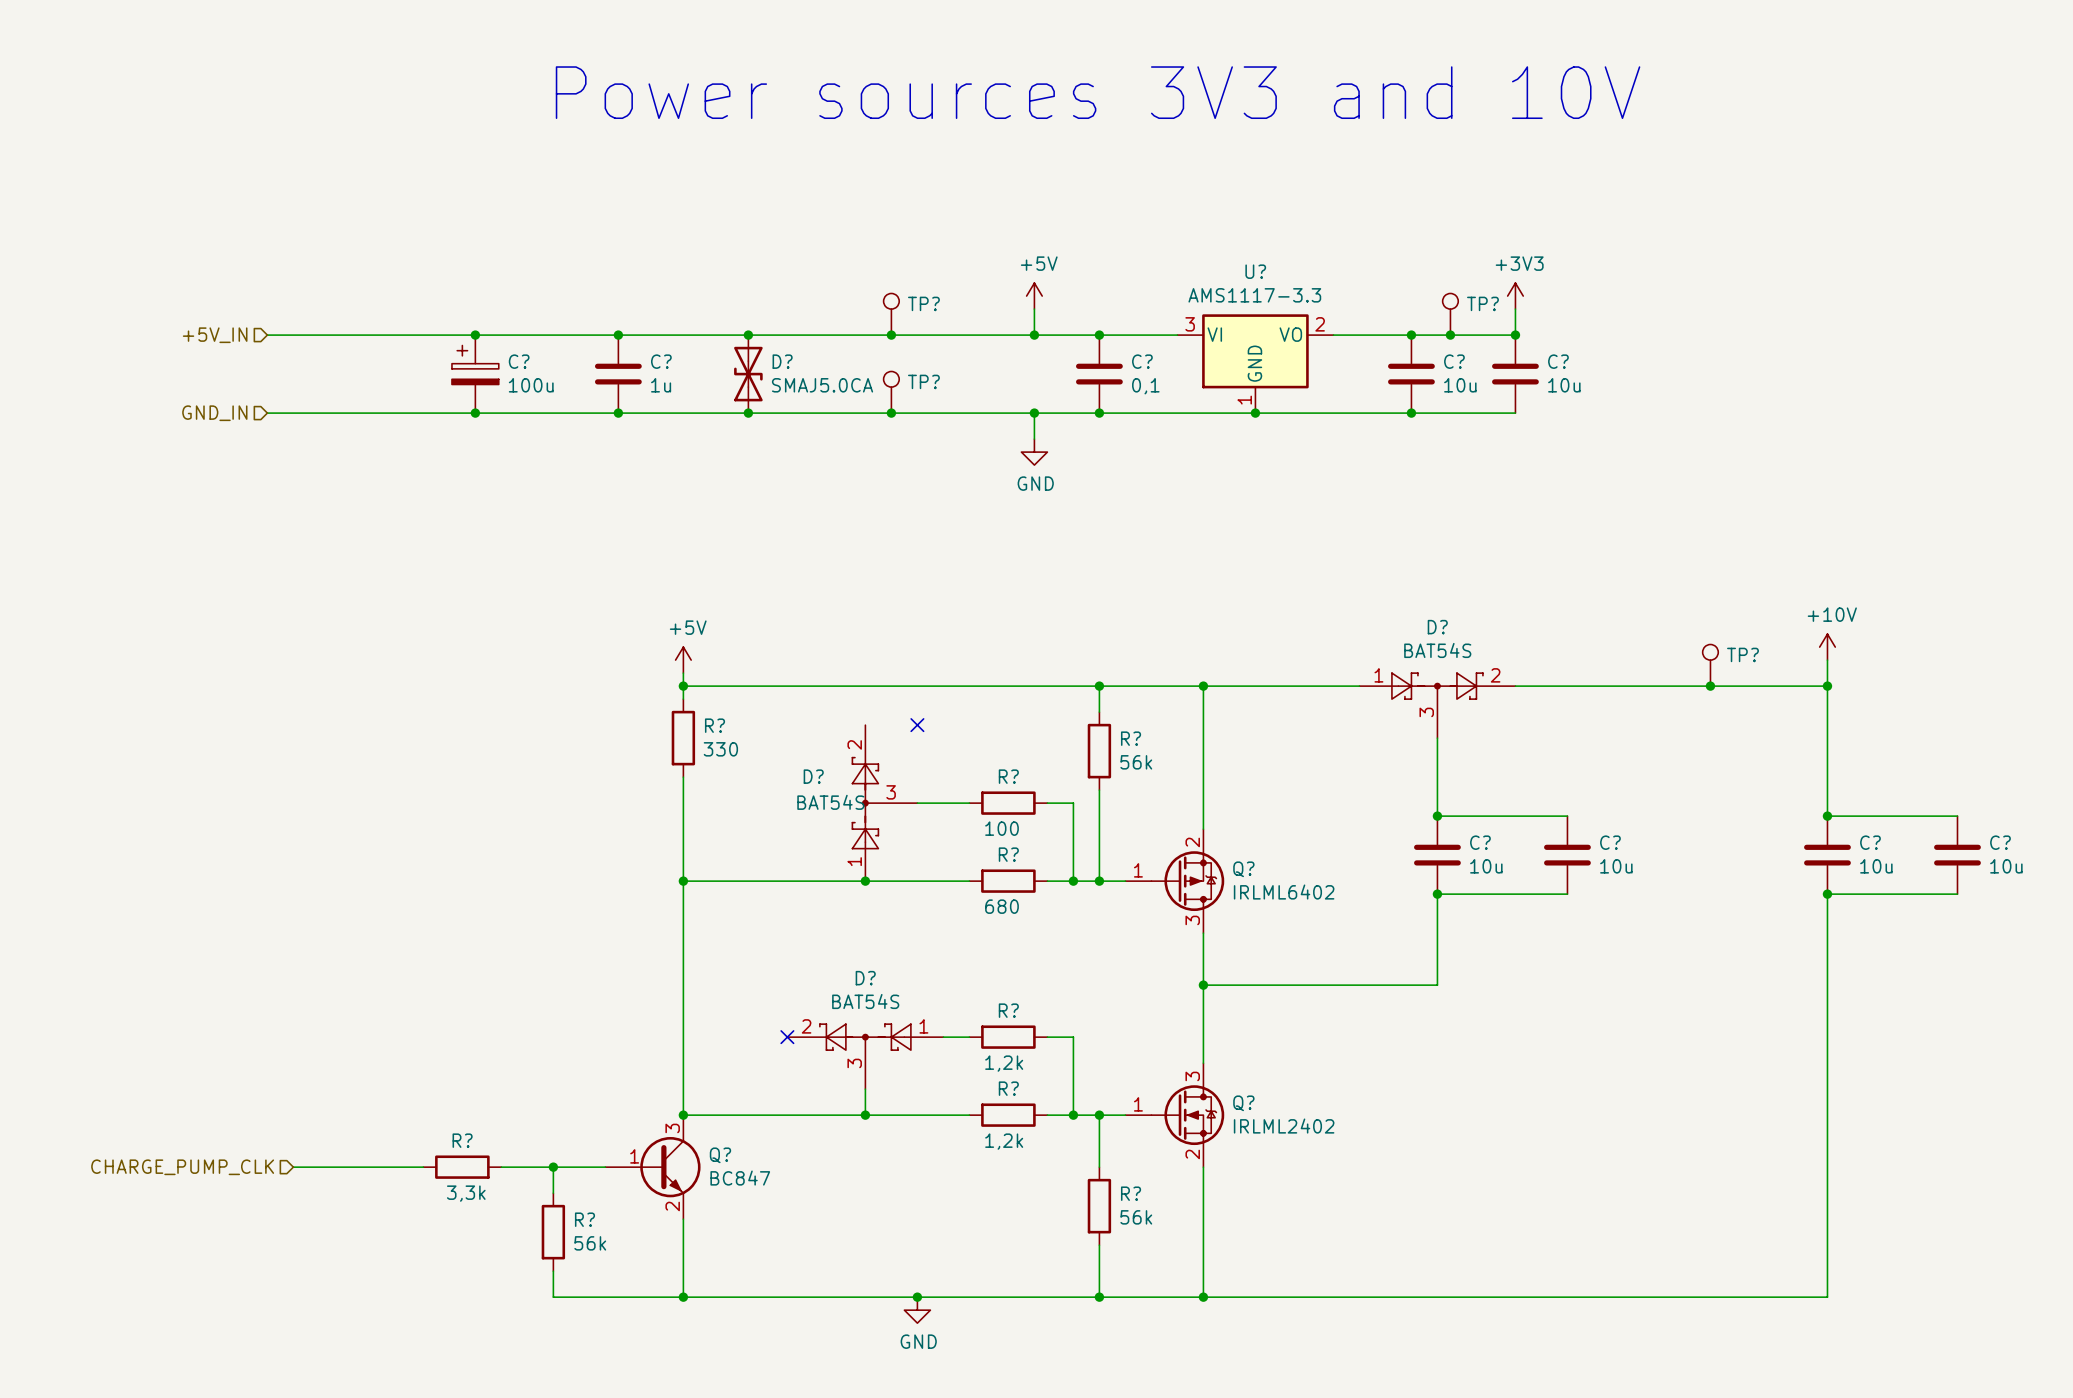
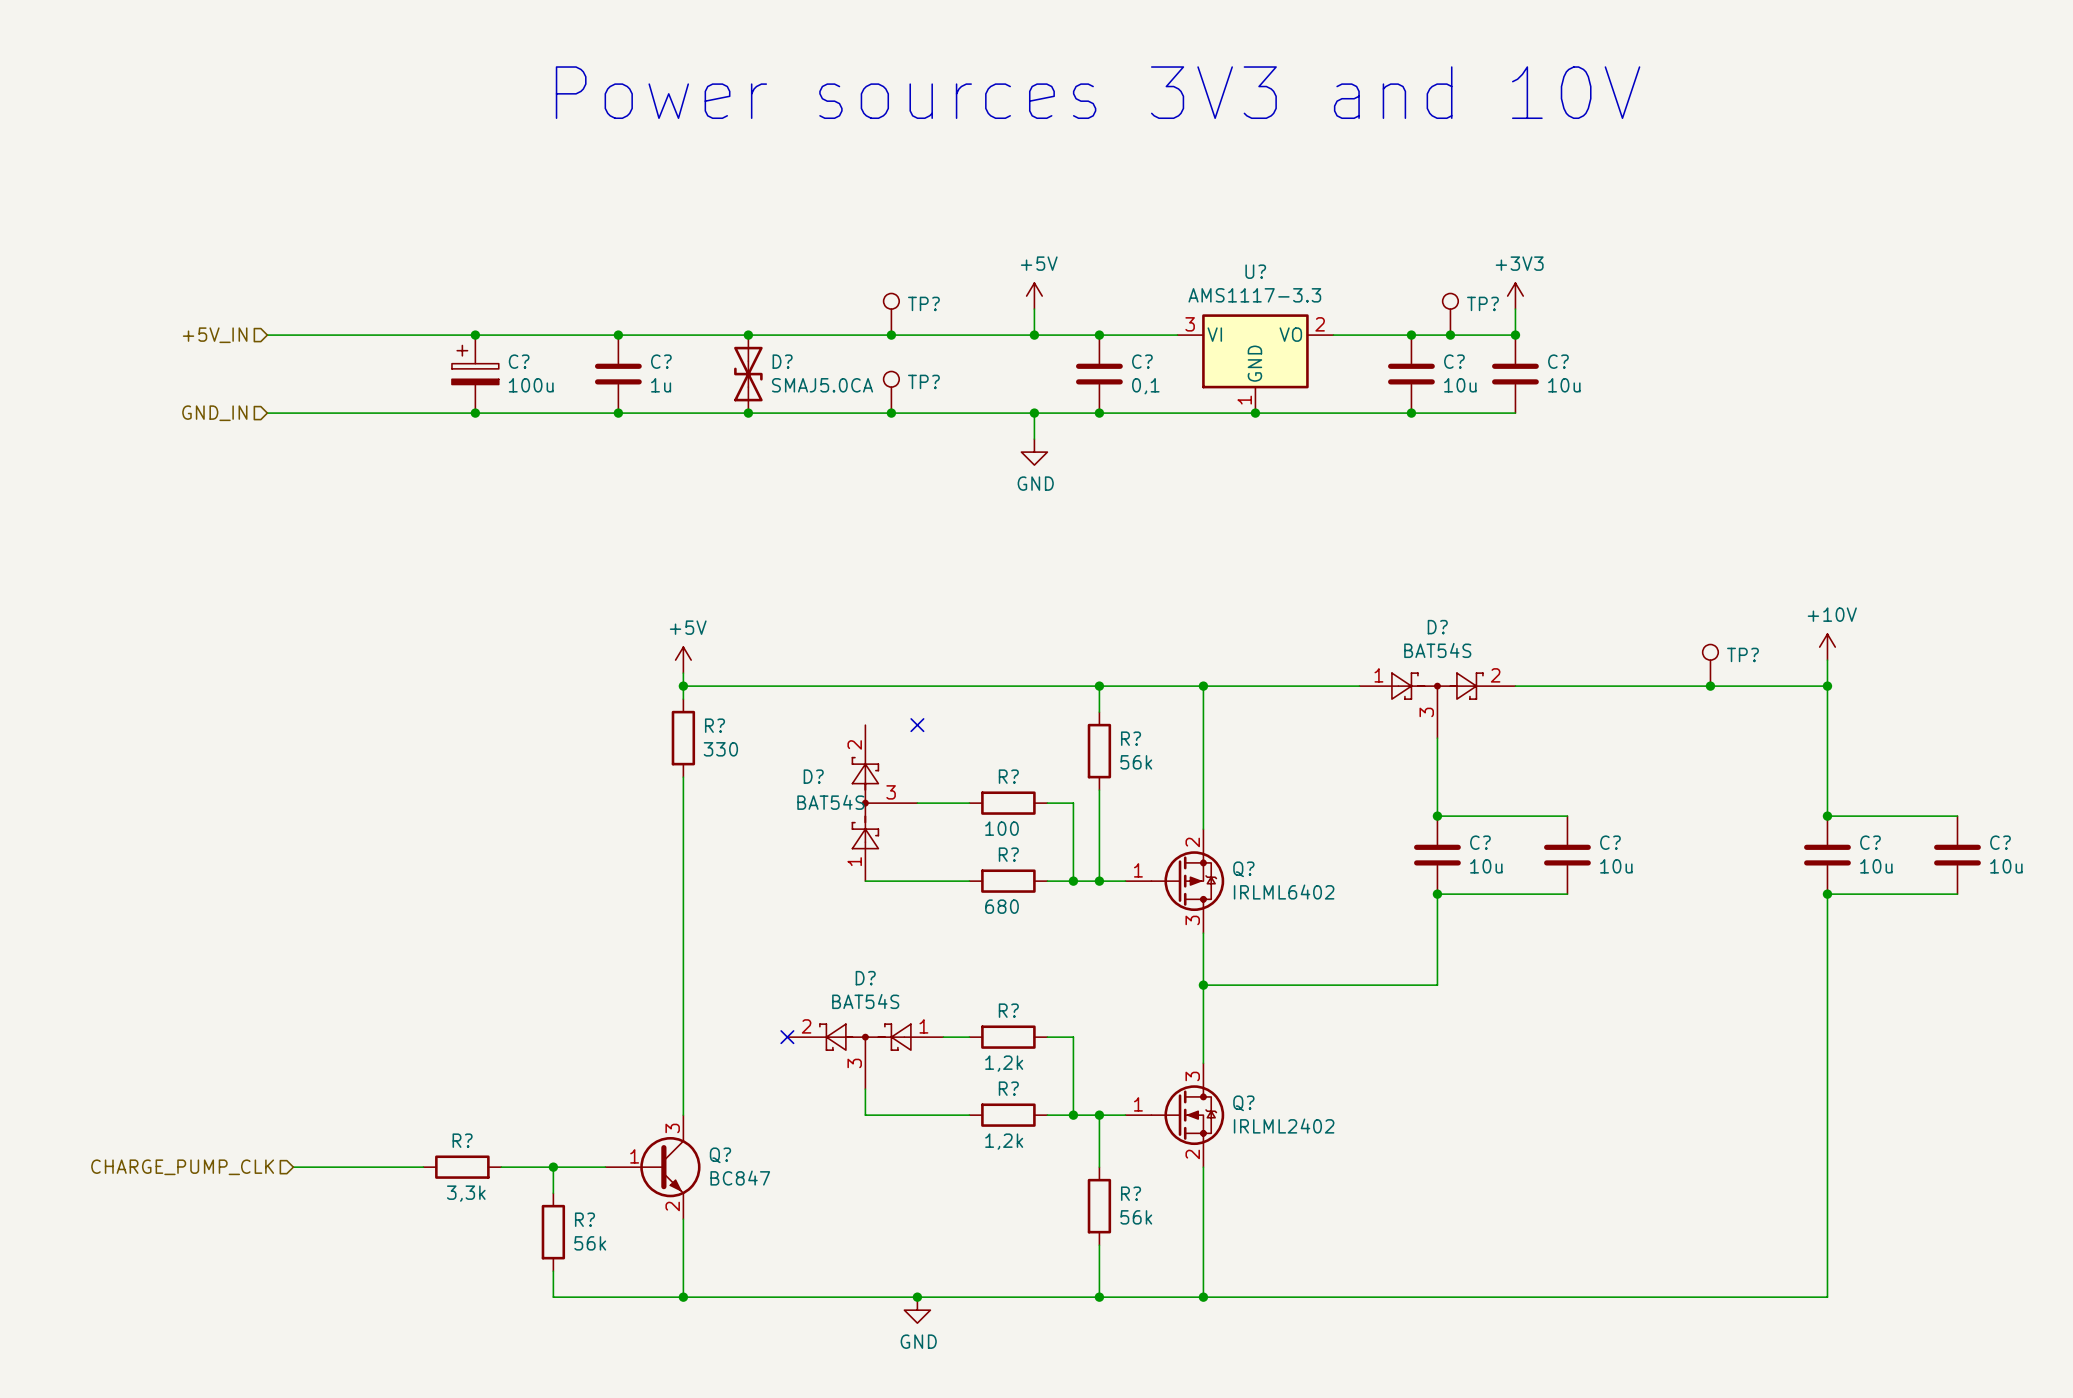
wire: (683, 881) (865, 881) -> none
junction: (683, 881) -> none
junction: (865, 881) -> none
wire: (683, 1115) (865, 1115) -> none
junction: (683, 1115) -> none
junction: (865, 1115) -> none

